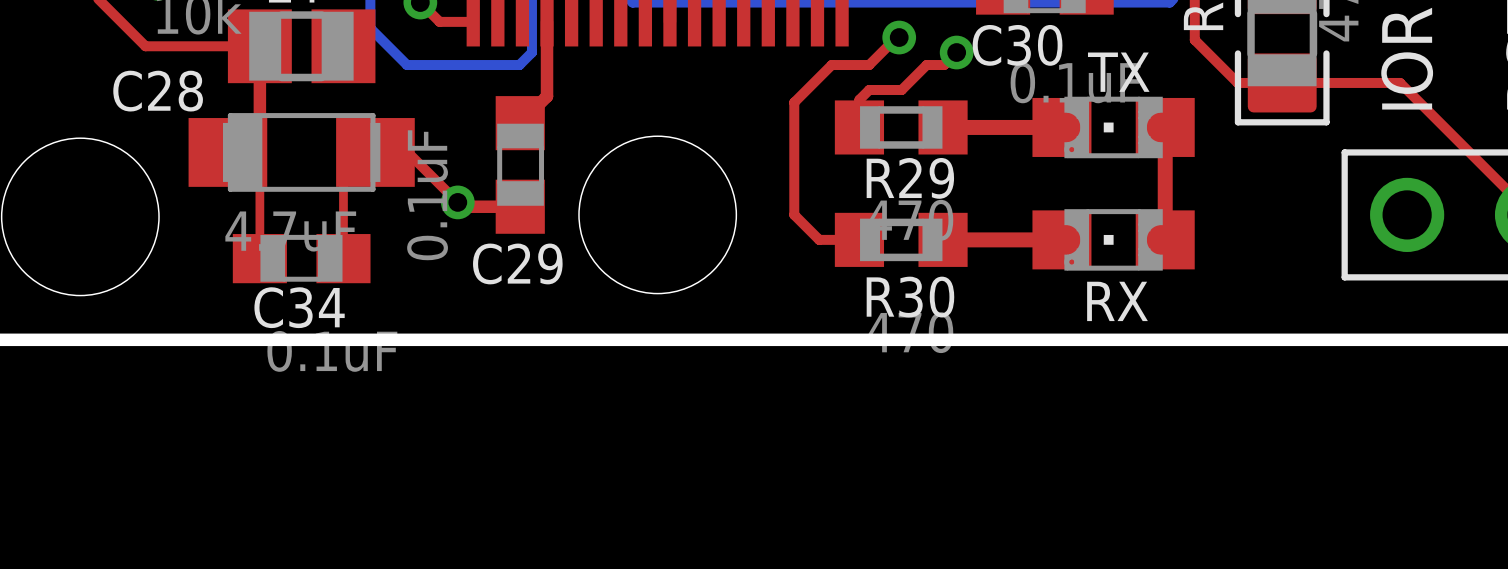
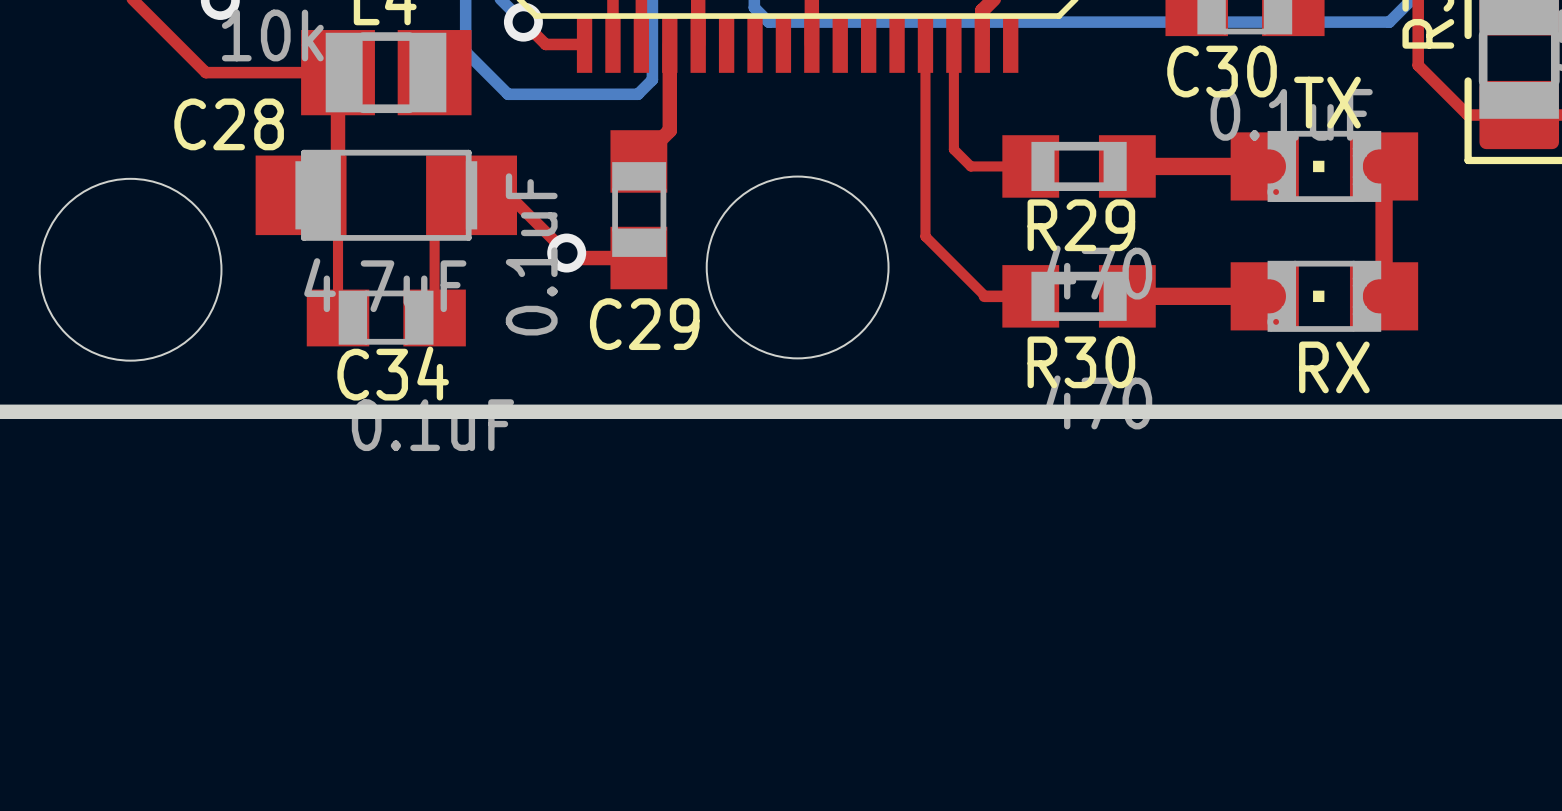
top track: (899, 37) (896, 37) (869, 65) (831, 65) (794, 102) (794, 214) (819, 239) -> (925, 44) (925, 236) (985, 296)
via: (899, 37) -> none
top track: (956, 52) (944, 65) (926, 65) (901, 89) (869, 89) (859, 99) (859, 127) -> (953, 44) (953, 149) (970, 166) (1030, 166)
via: (956, 52) -> none

